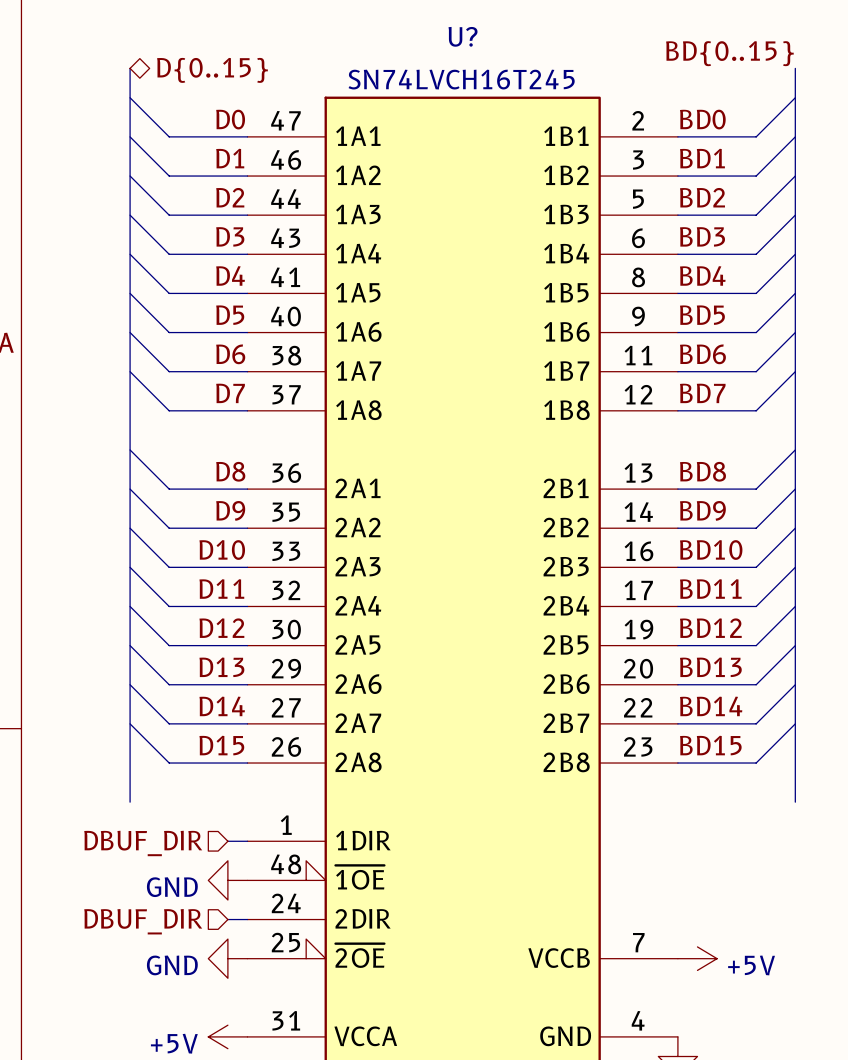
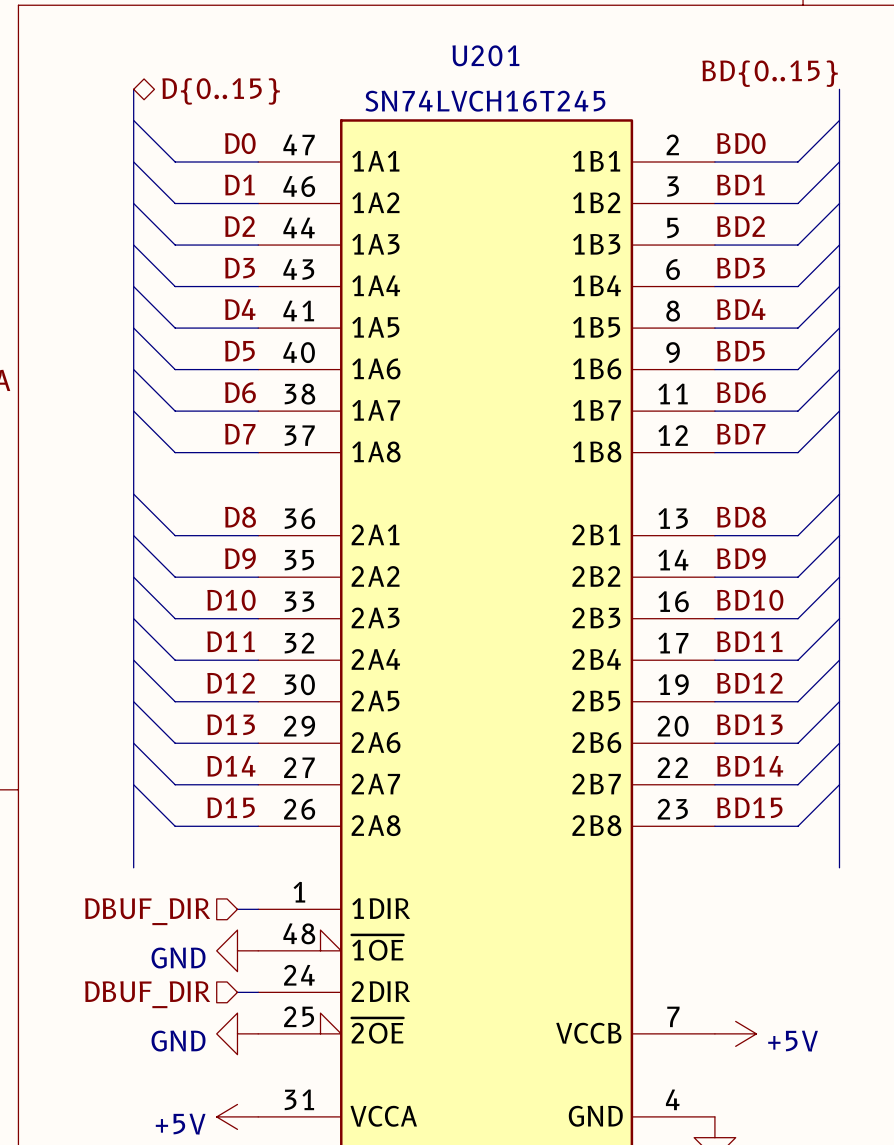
U? name: U? (463, 36) -> U201 (485, 55)

